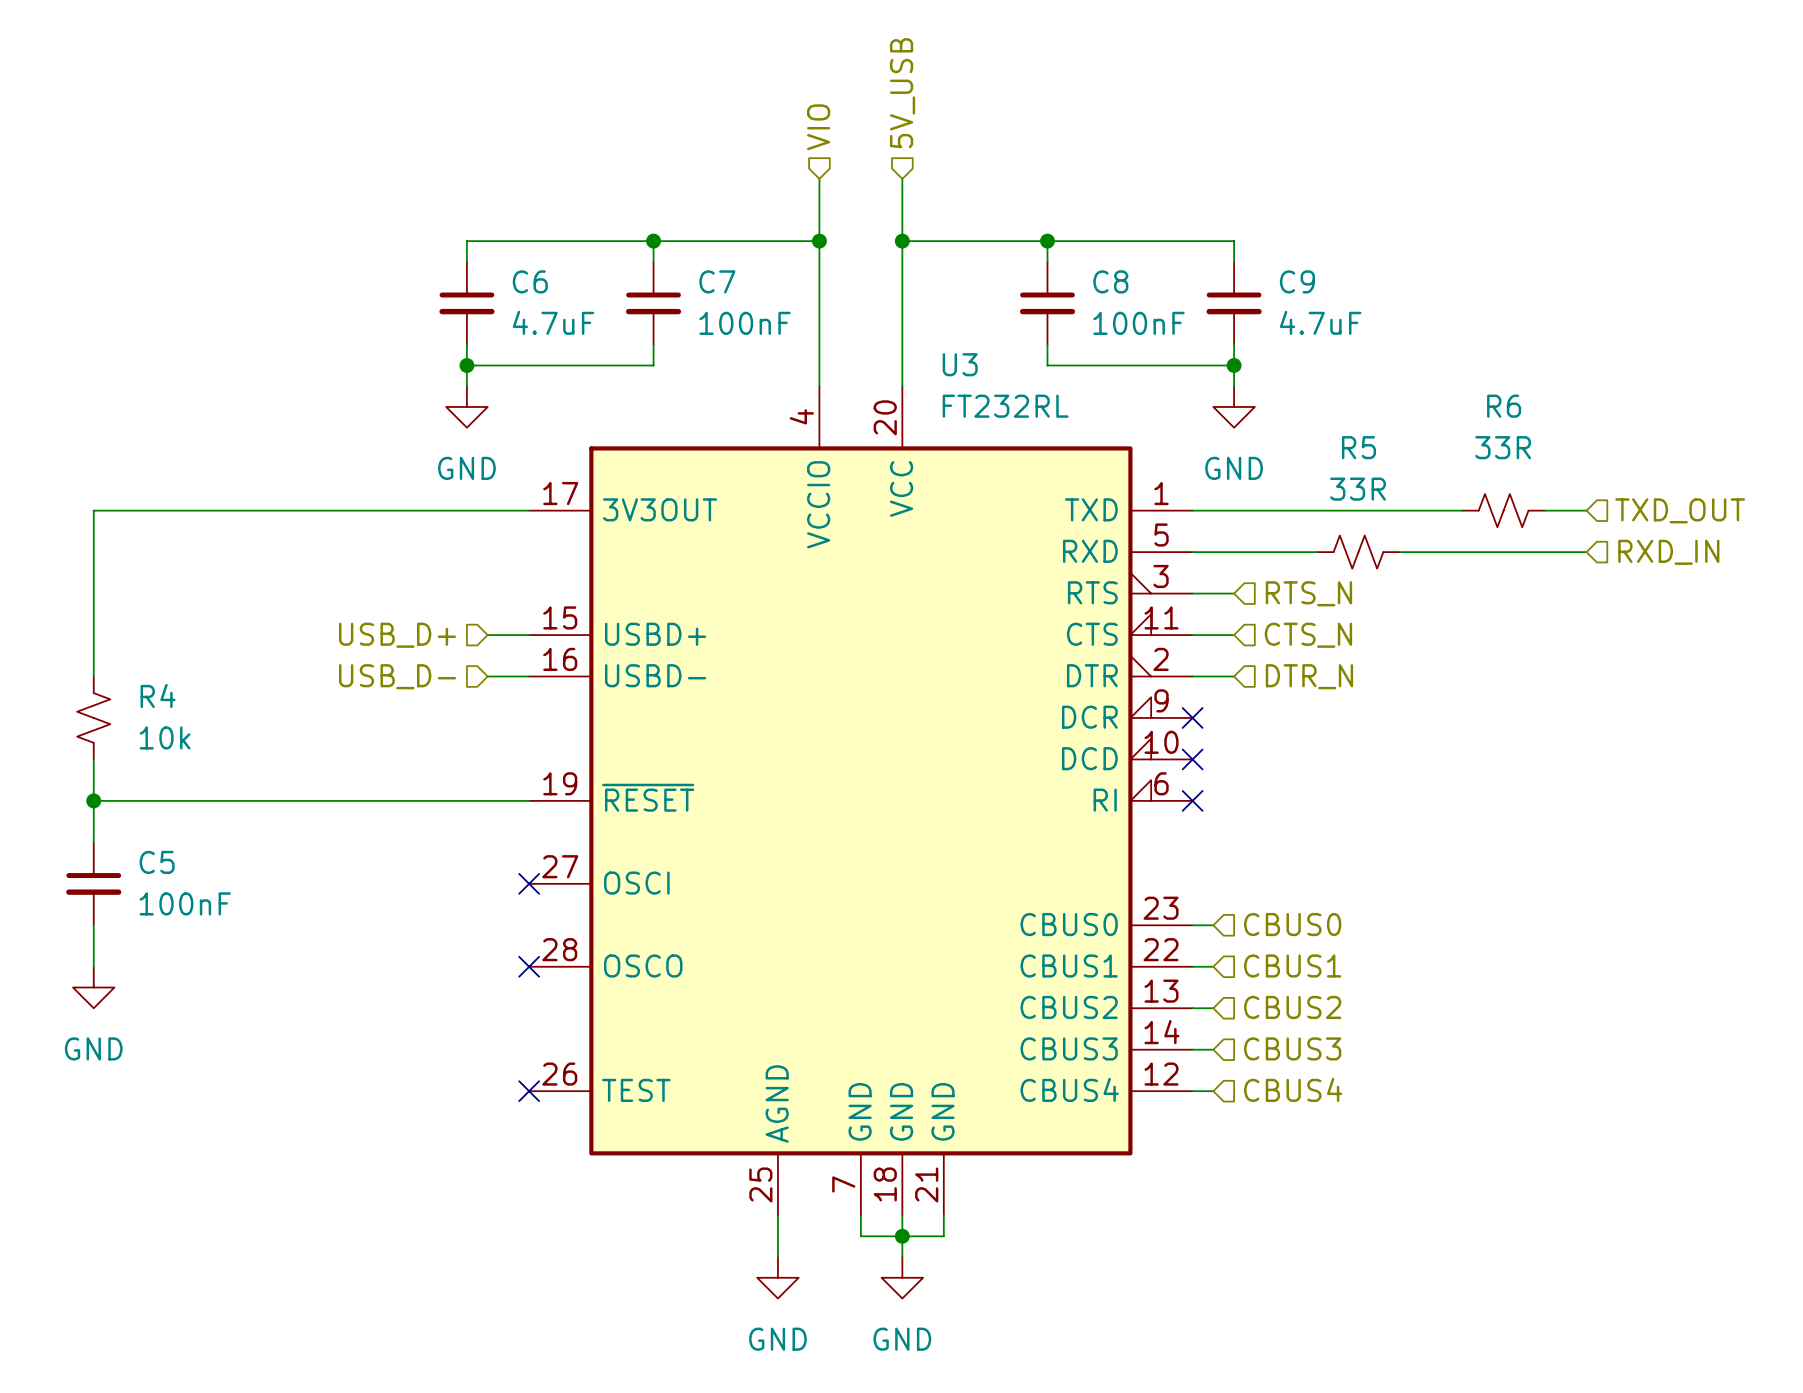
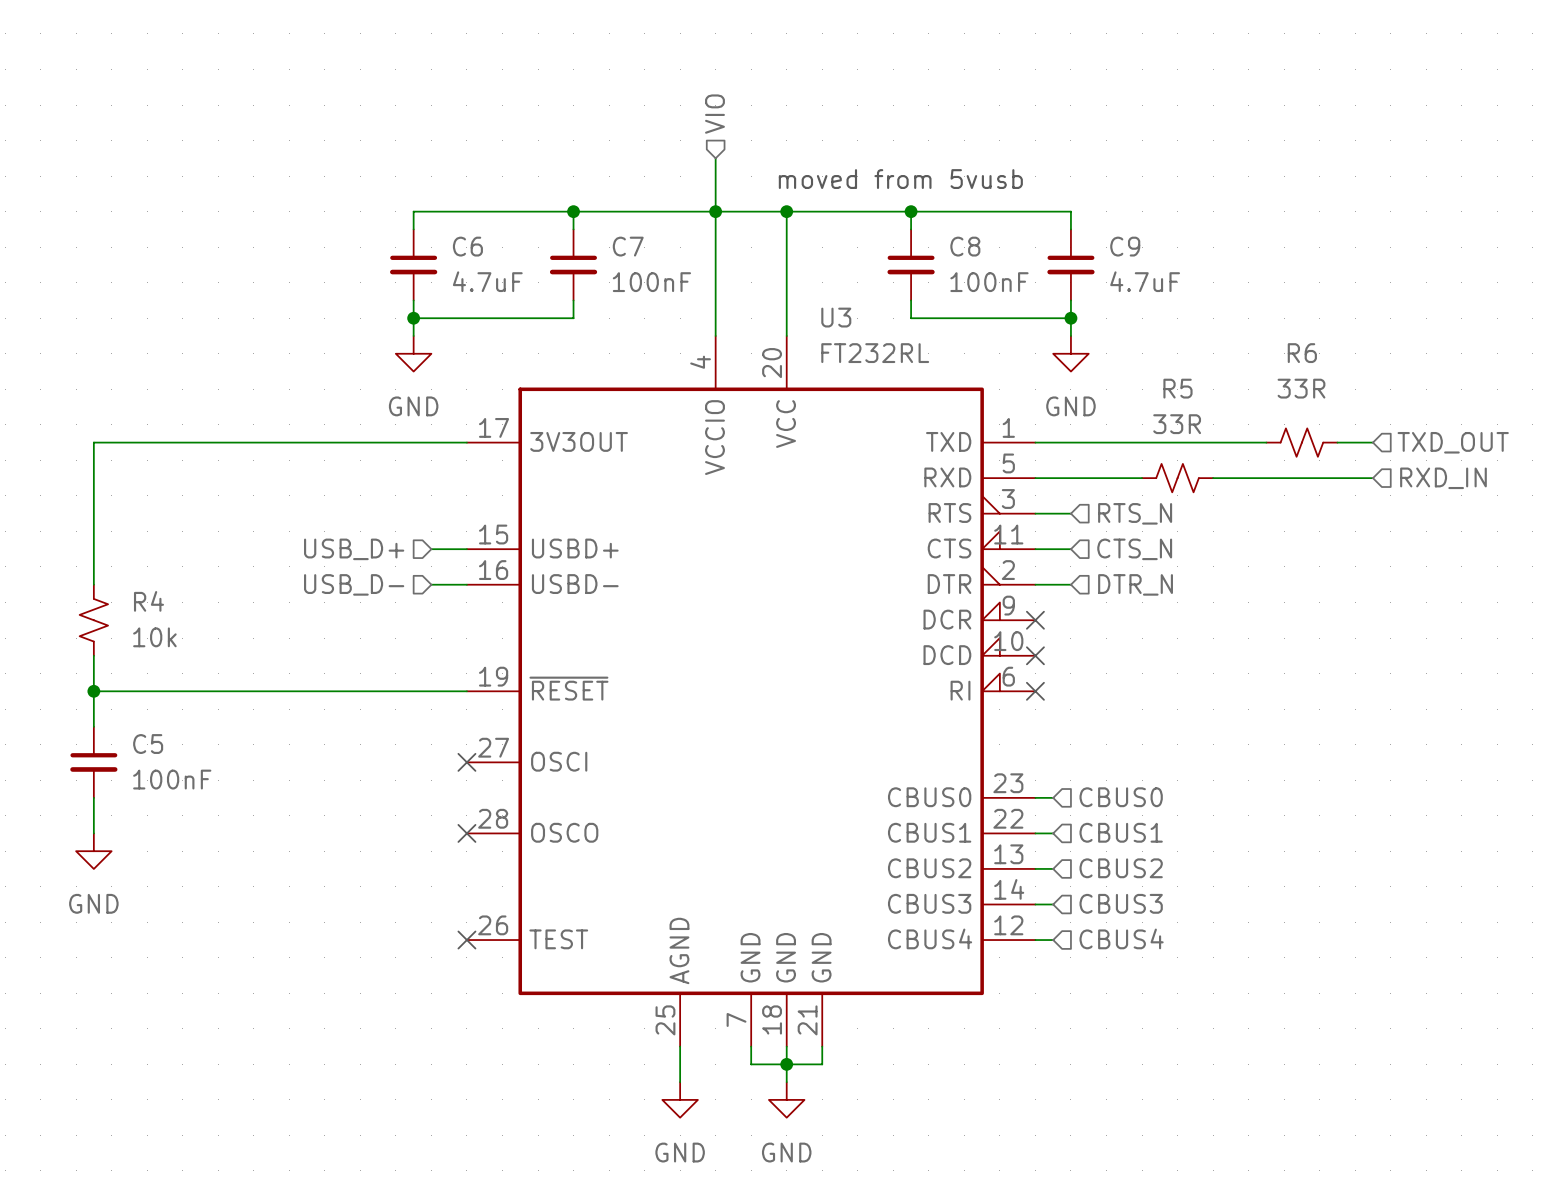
hierarchical label: 5V_USB (902, 93) -> none
wire: (902, 178) (902, 241) -> (715, 211) (786, 211)
text: none -> moved from 5vusb (900, 179)

